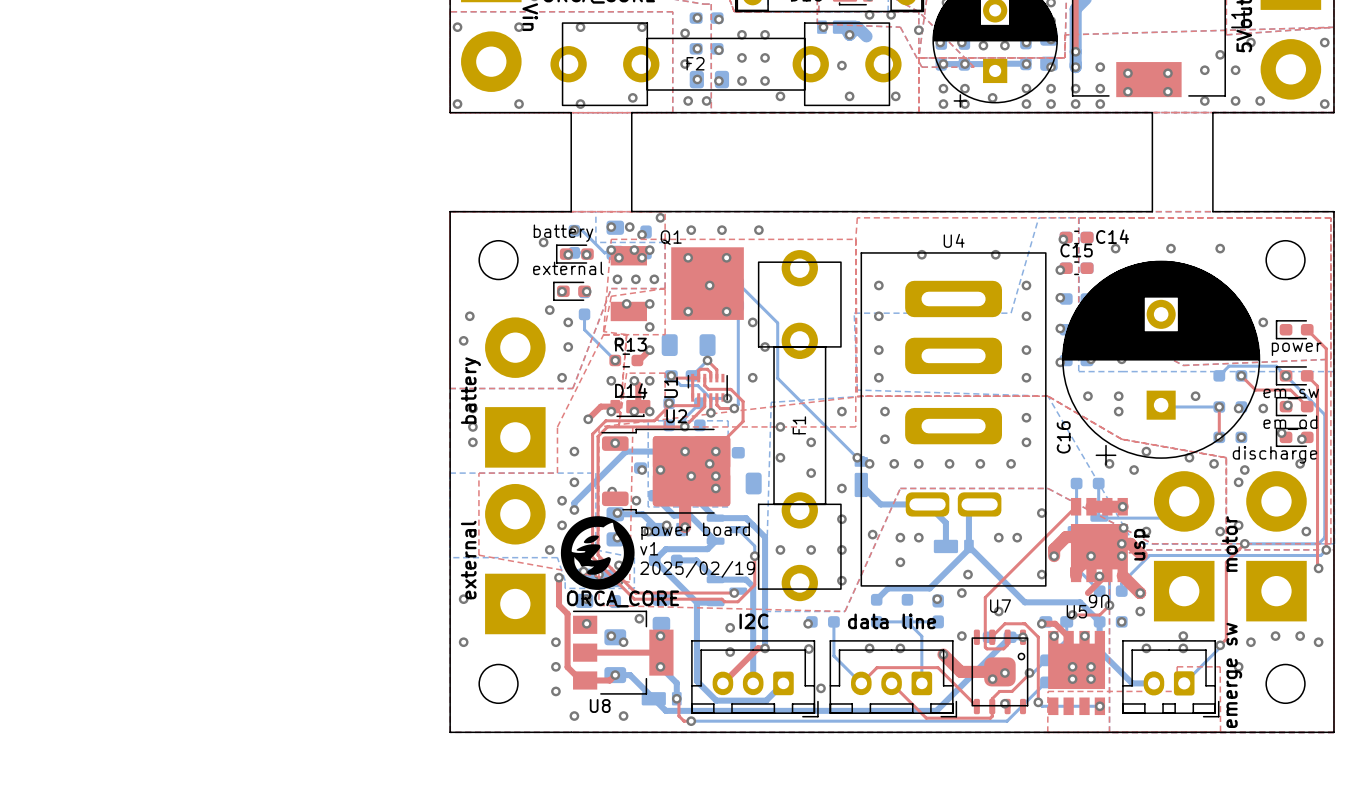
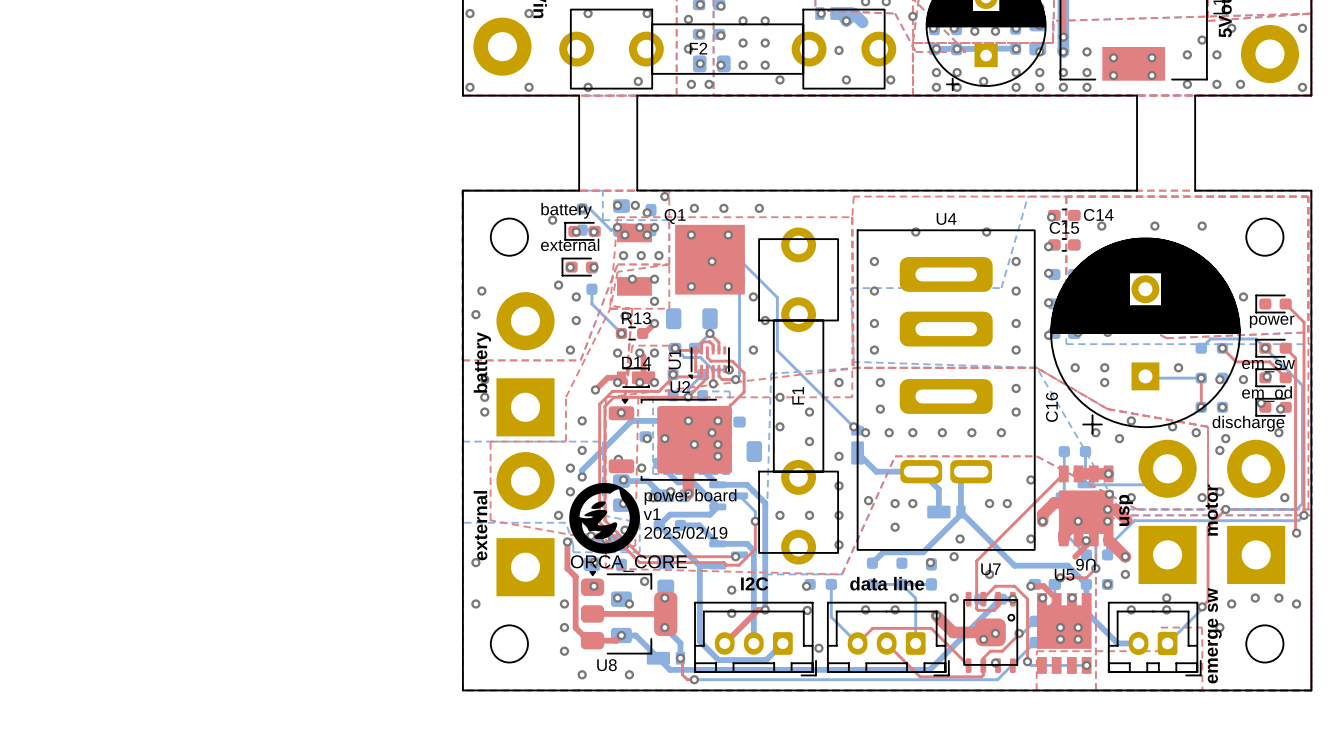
U1 footprint: [687, 373, 728, 402] -> [688, 346, 730, 380]
U2 footprint: [601, 428, 731, 514] -> [608, 398, 732, 481]
U8 footprint: [572, 610, 674, 695] -> [580, 570, 678, 655]

